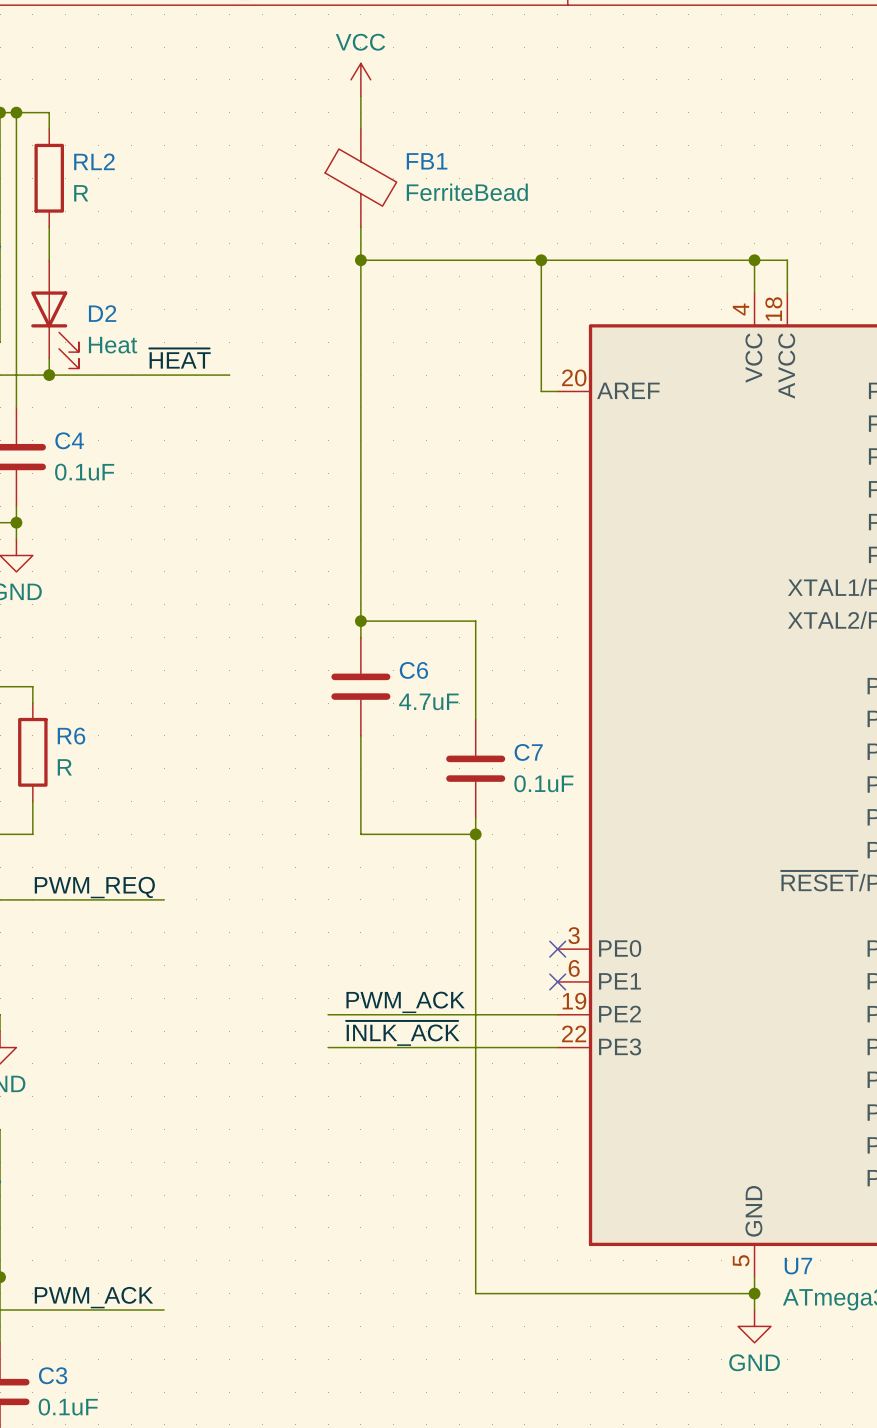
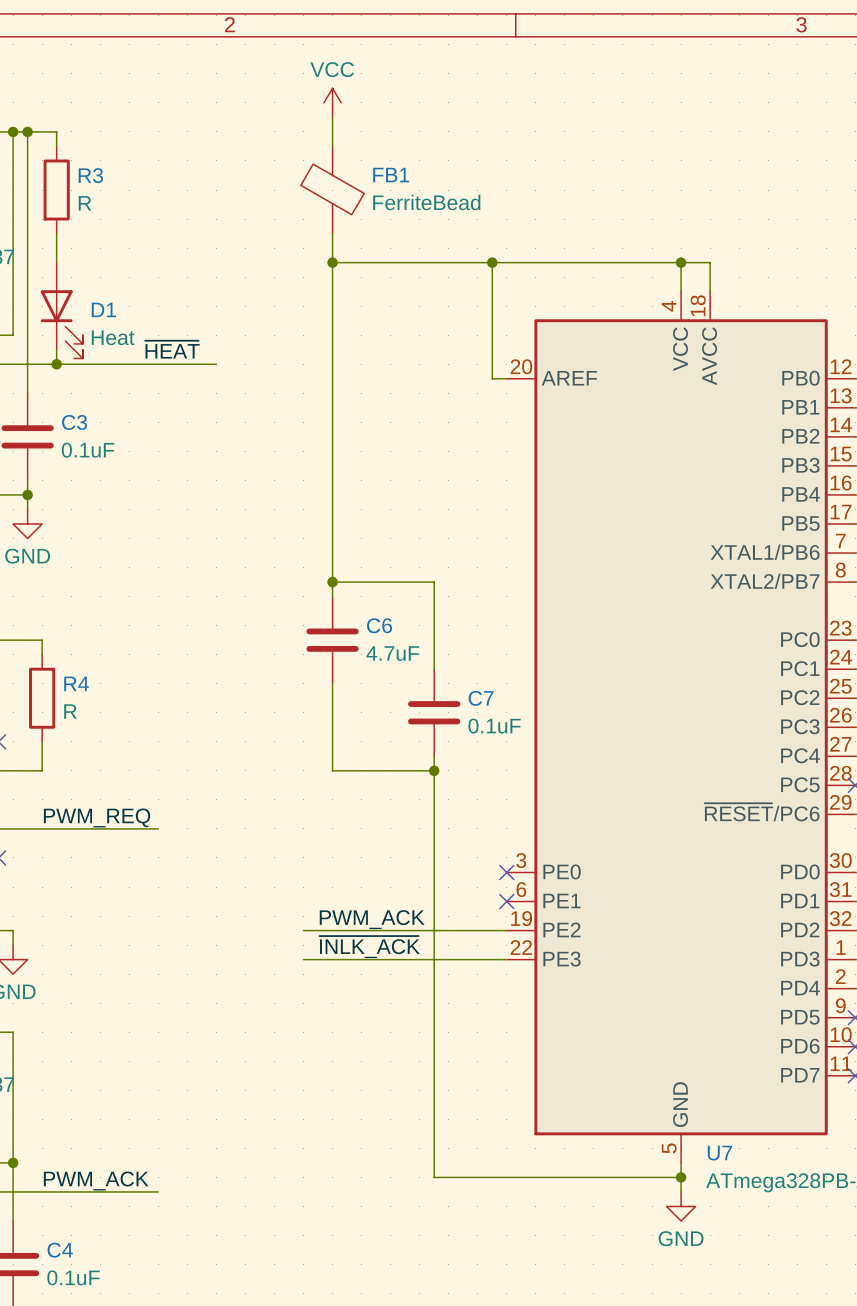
RL2 name: RL2 (94, 161) -> R3 (90, 175)
D2 name: D2 (102, 313) -> D1 (103, 309)
C4 name: C4 (69, 440) -> C3 (74, 422)
R6 name: R6 (71, 736) -> R4 (76, 683)
C3 name: C3 (53, 1375) -> C4 (60, 1250)

